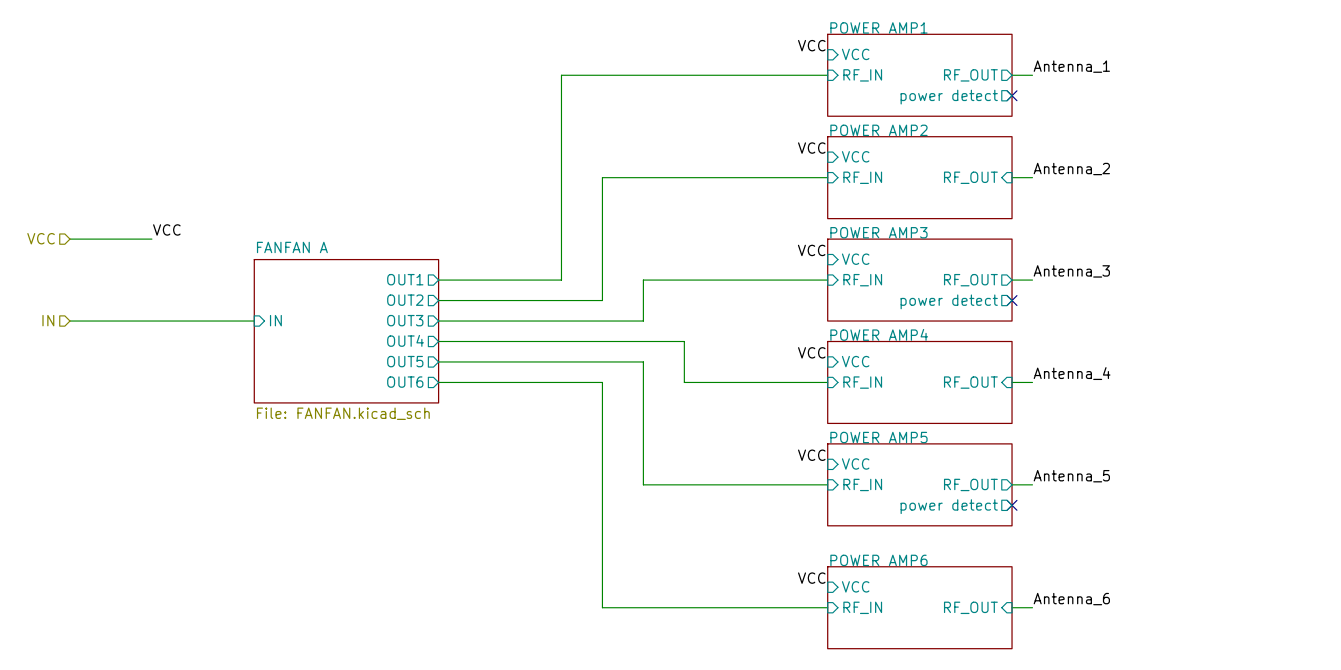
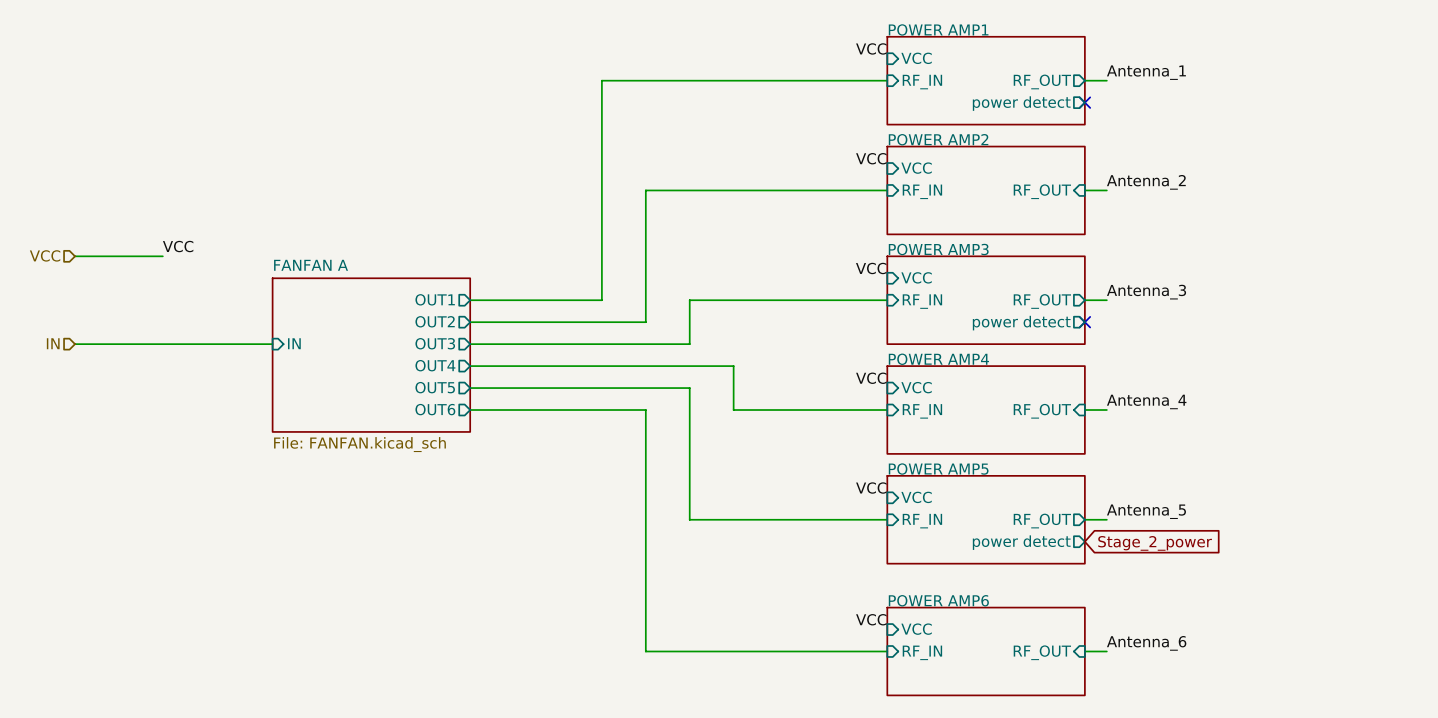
no-connect mark: (1012, 505) -> none
global label: none -> Stage_2_power (1155, 543)

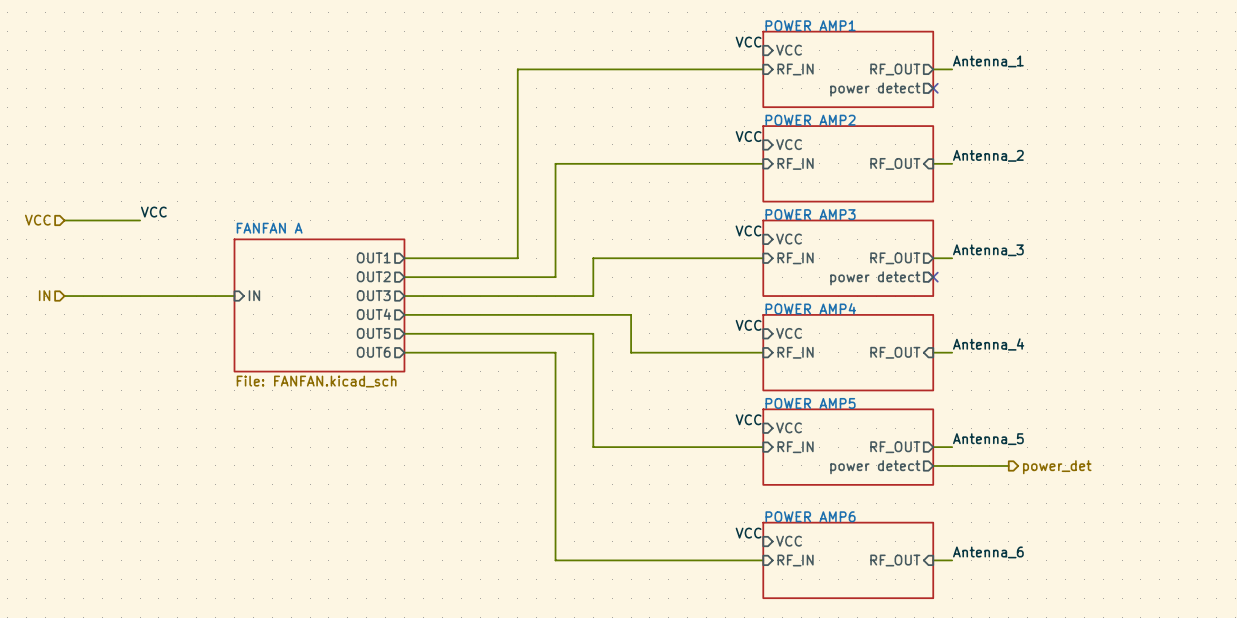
wire: none -> (933, 465) (1008, 465)
hierarchical label: none -> power_det (1057, 467)
global label: Stage_2_power (1155, 543) -> none

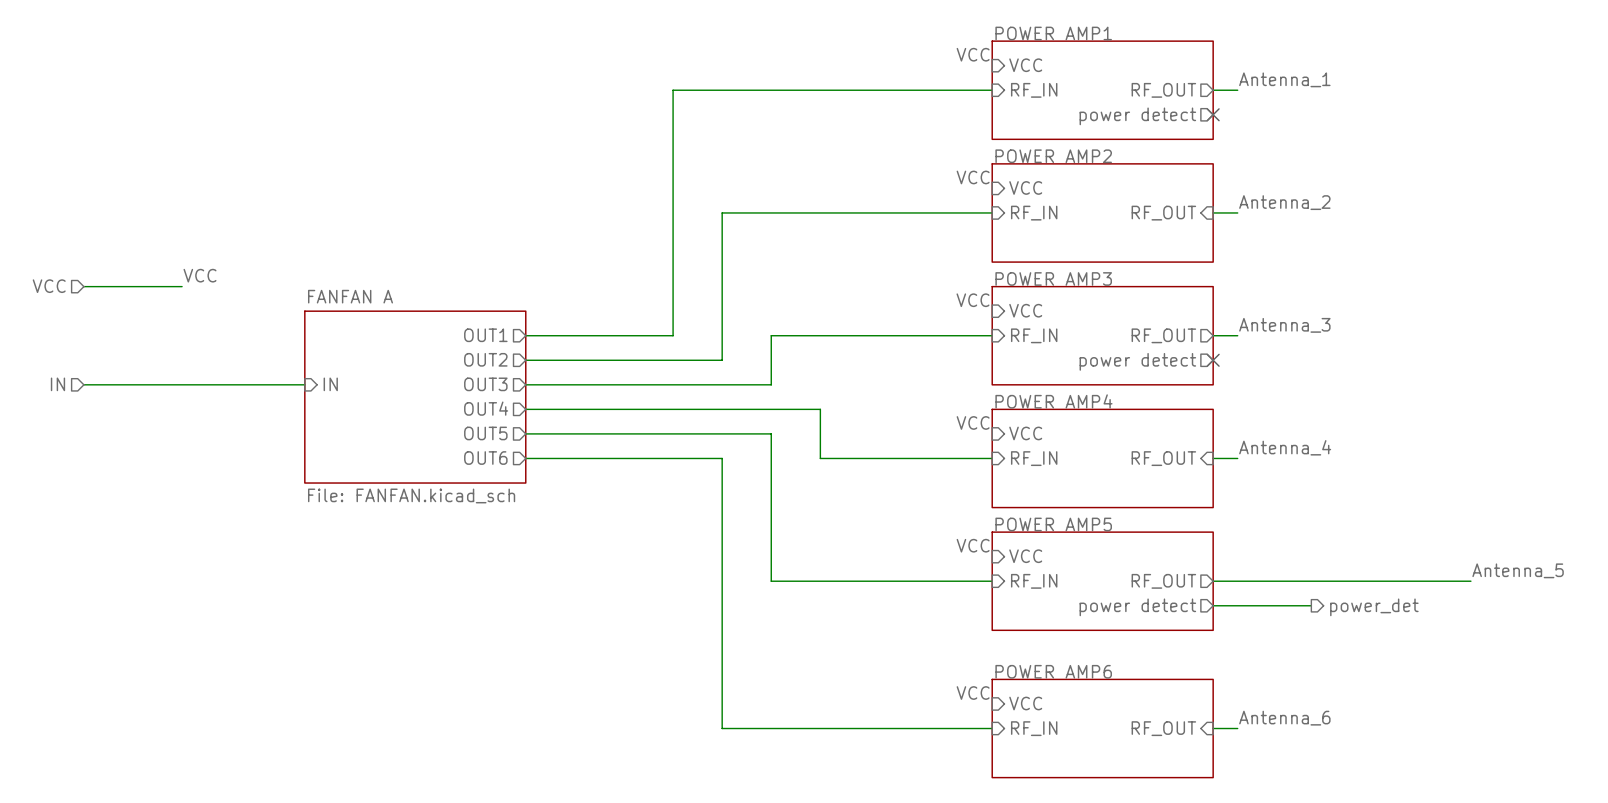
label position: Antenna_5 (988, 439) -> Antenna_5 (1518, 570)
wire: none -> (1237, 581) (1470, 581)

